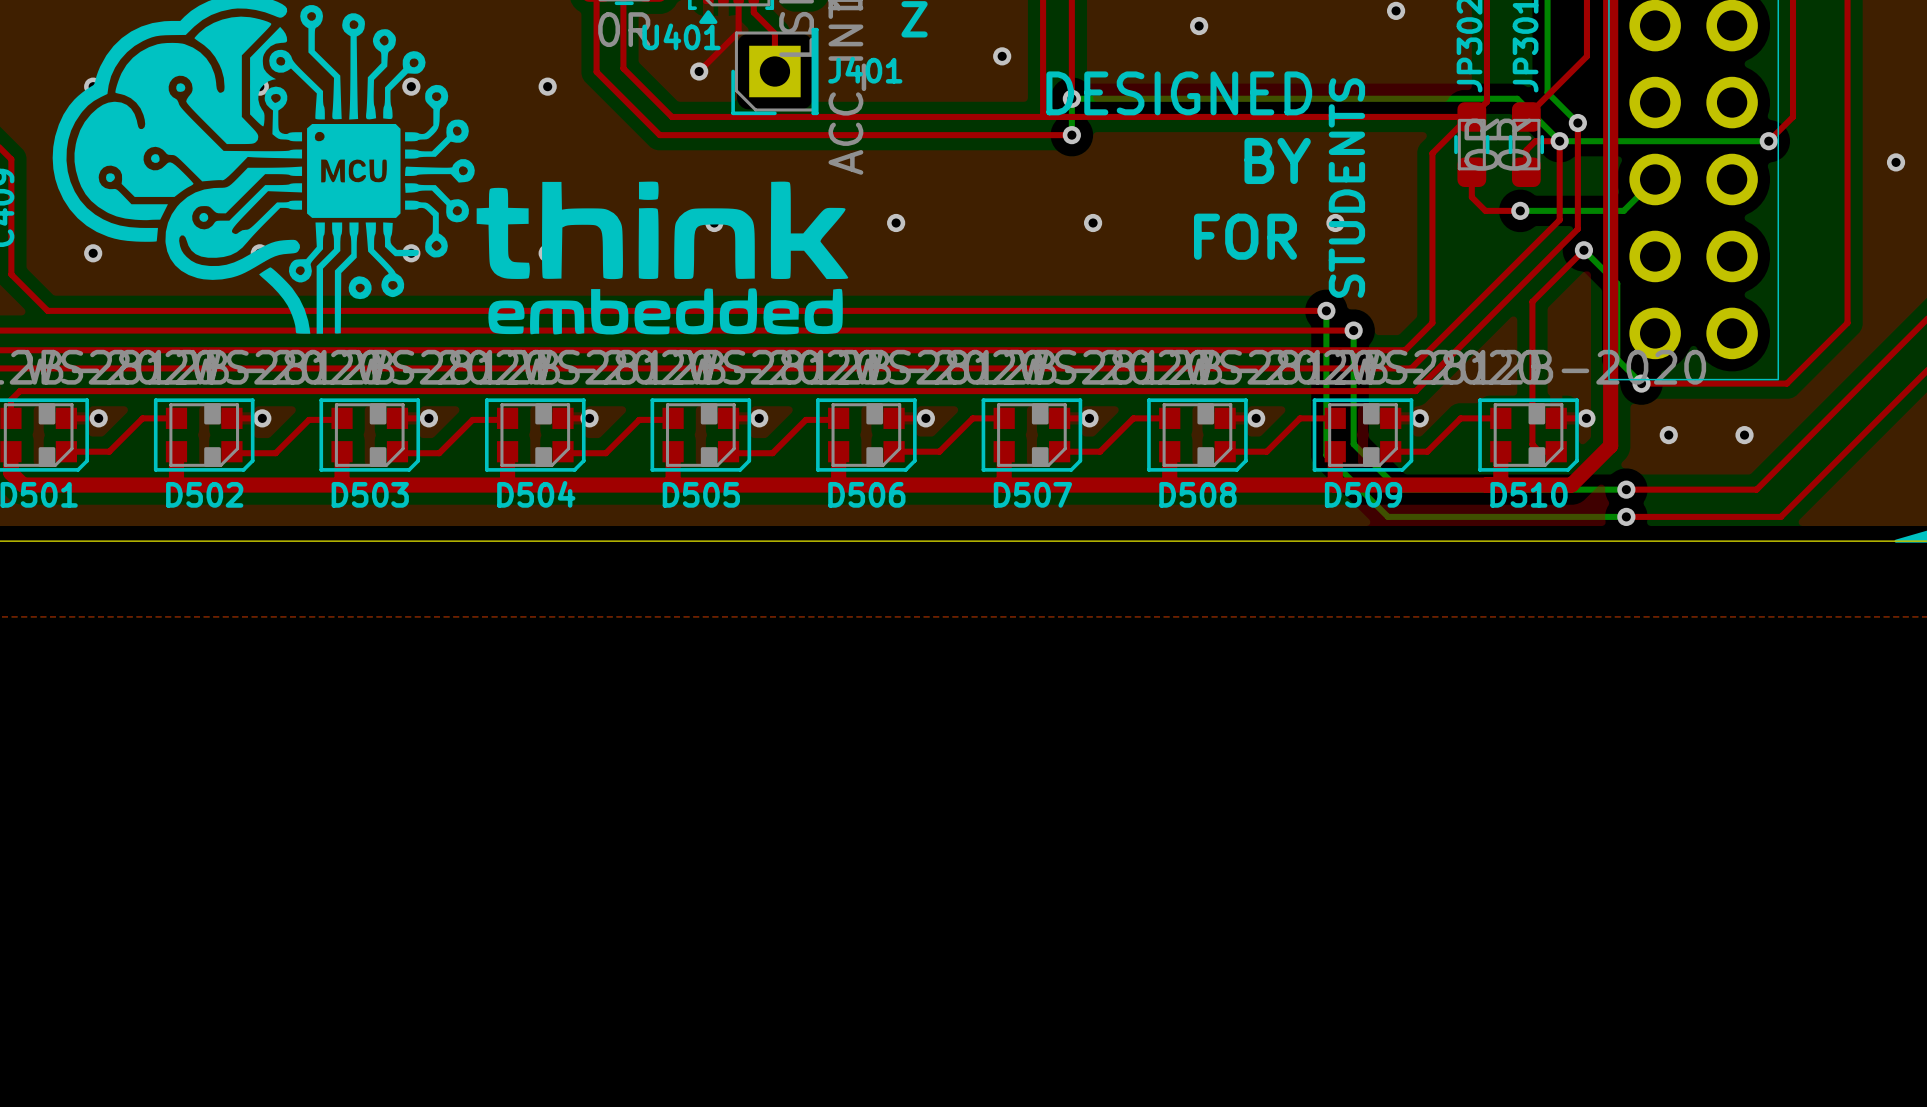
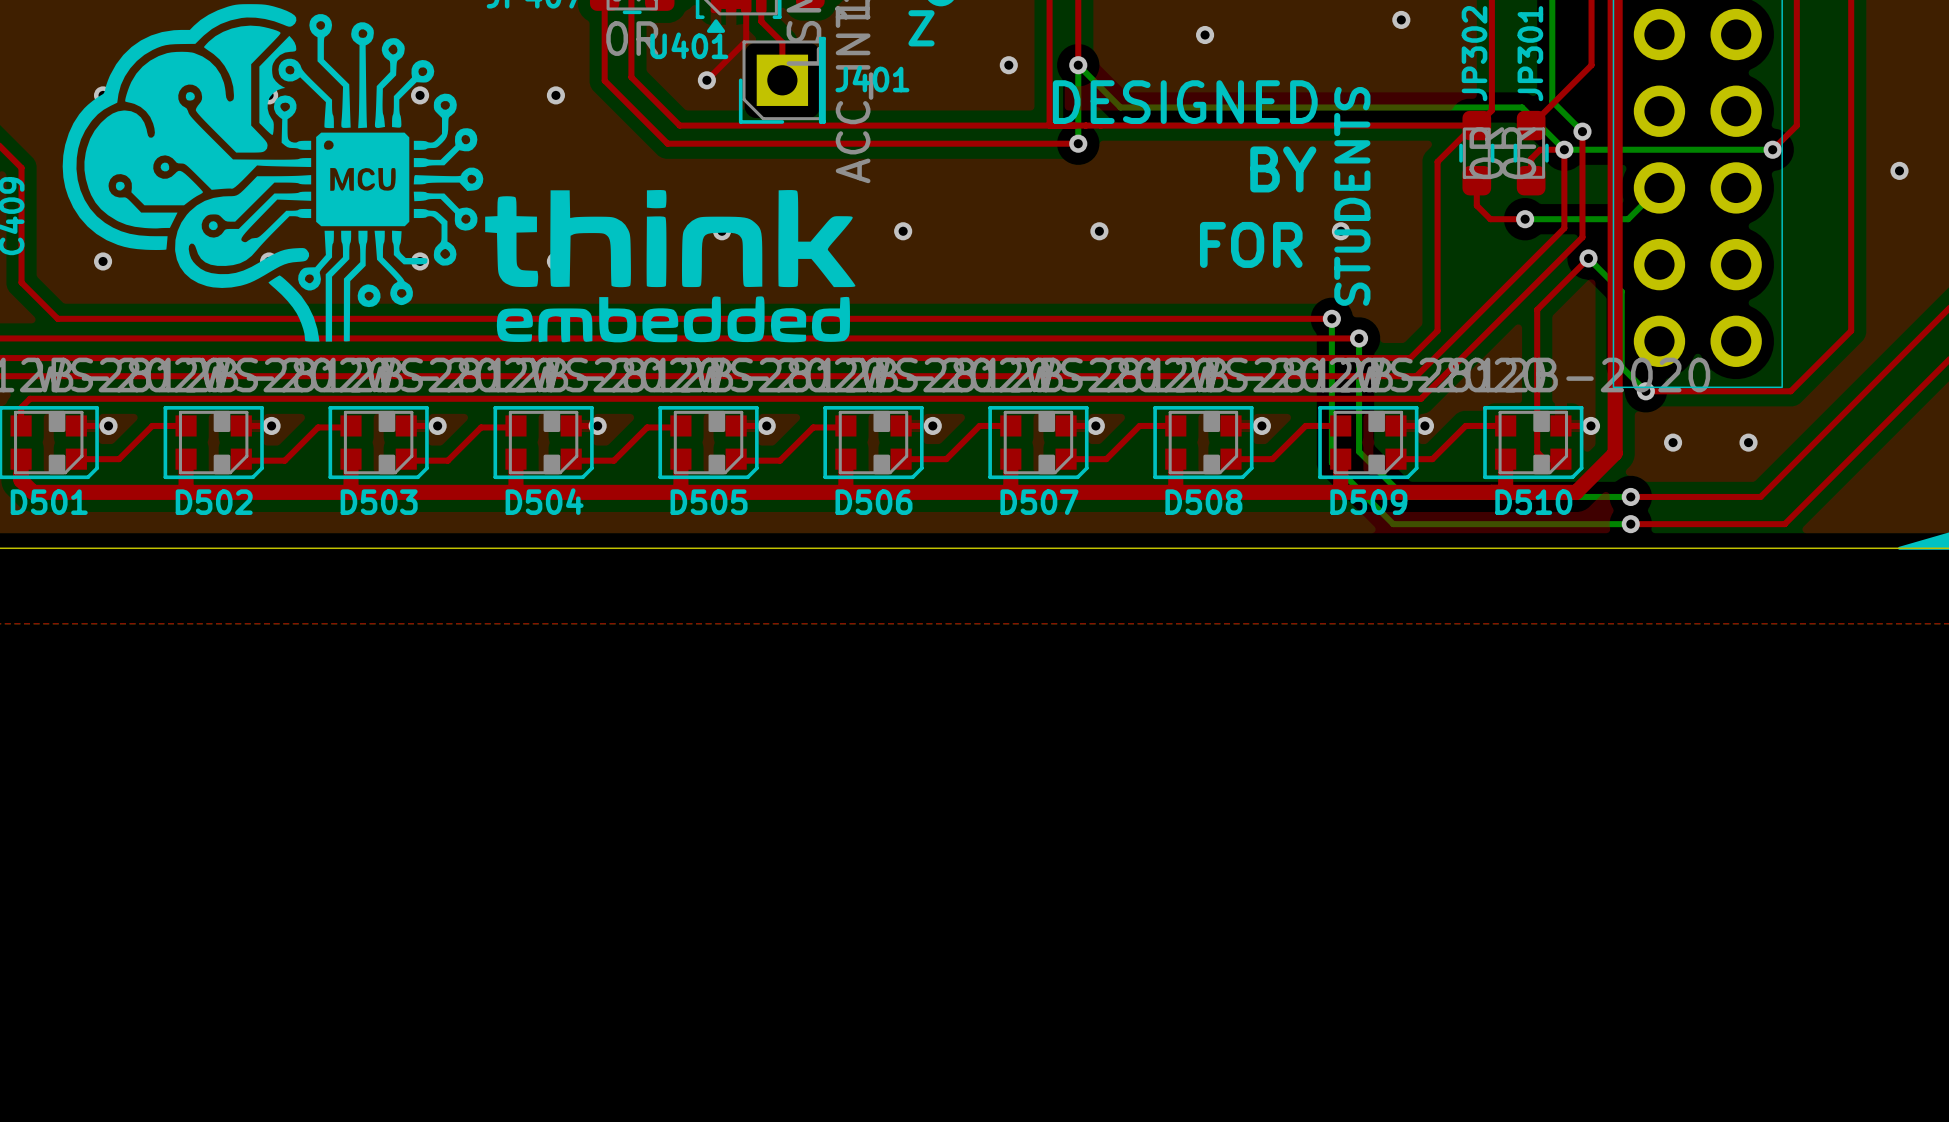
top track: (1071, 56) (1071, 98) -> none
bottom track: (1071, 98) (1114, 98) -> (1078, 107) (1078, 65) (1120, 107)
via position: (1071, 98) -> (1078, 65)

